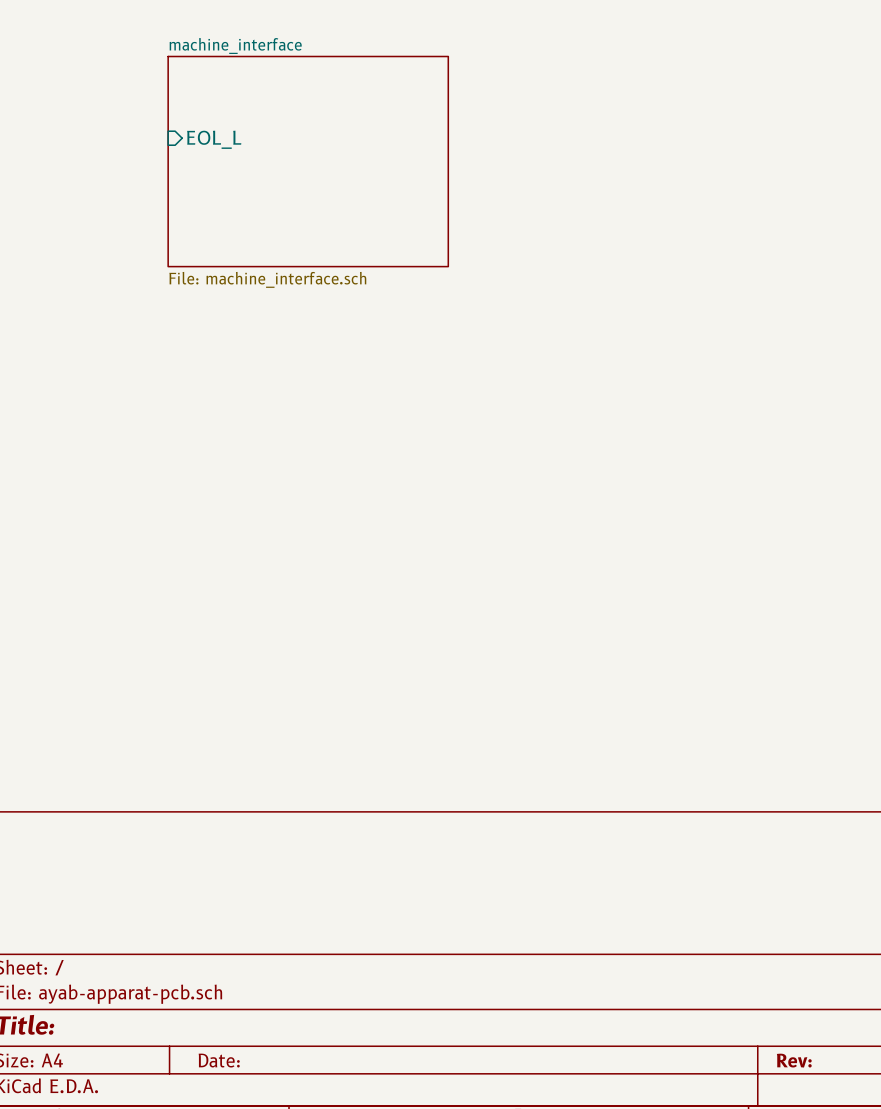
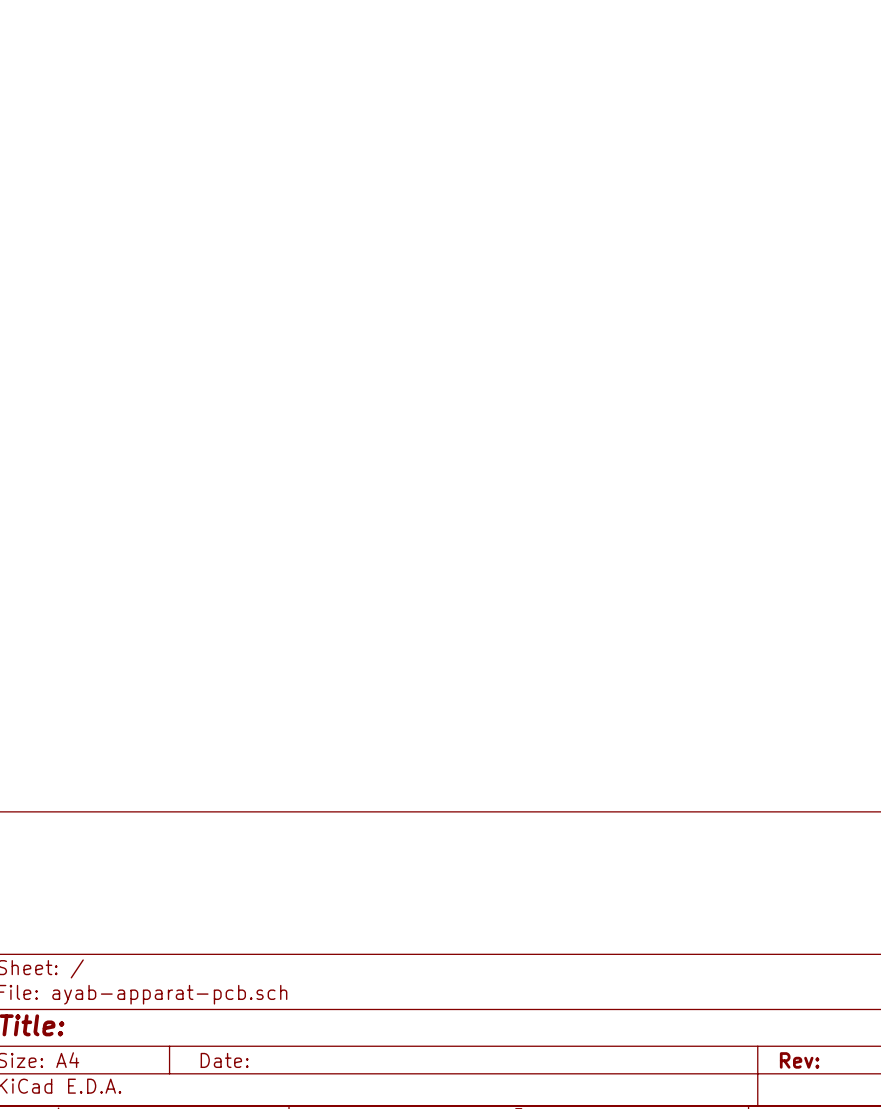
sheet pin: EOL_L (214, 139) -> none
sheet machine_interface: File: machine_interface.sch (308, 161) -> none

